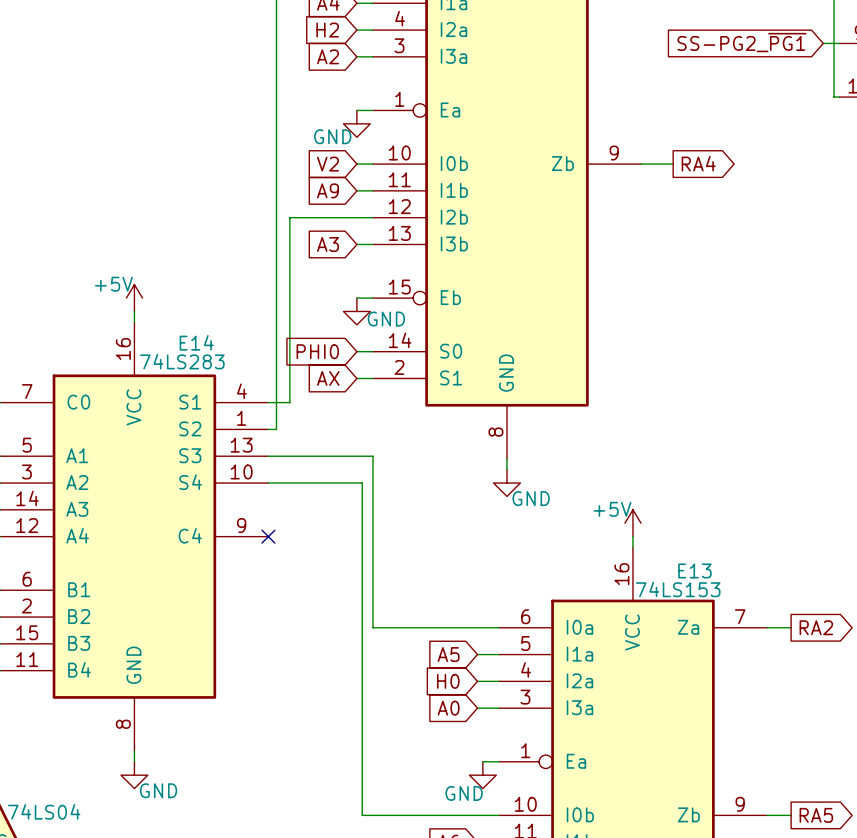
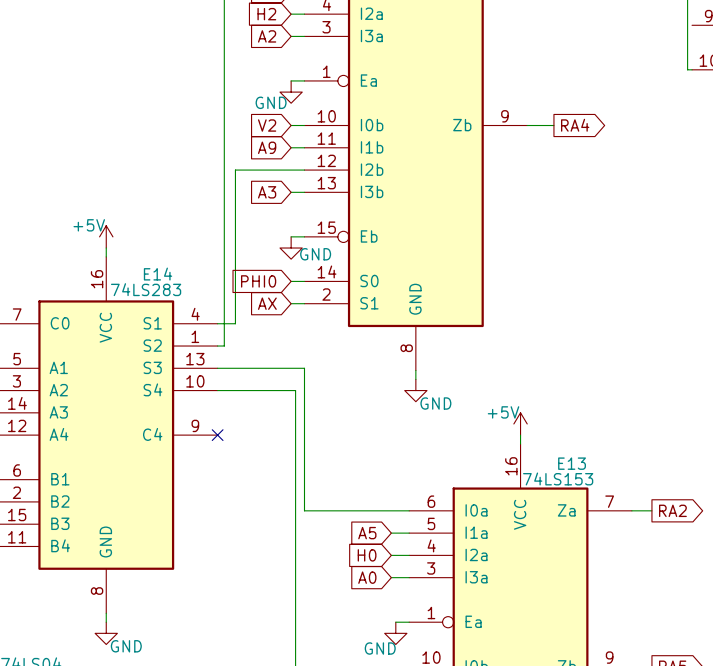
global label: SS-PG2_~{PG1} (742, 42) -> none
wire: (823, 43) (839, 43) -> none

